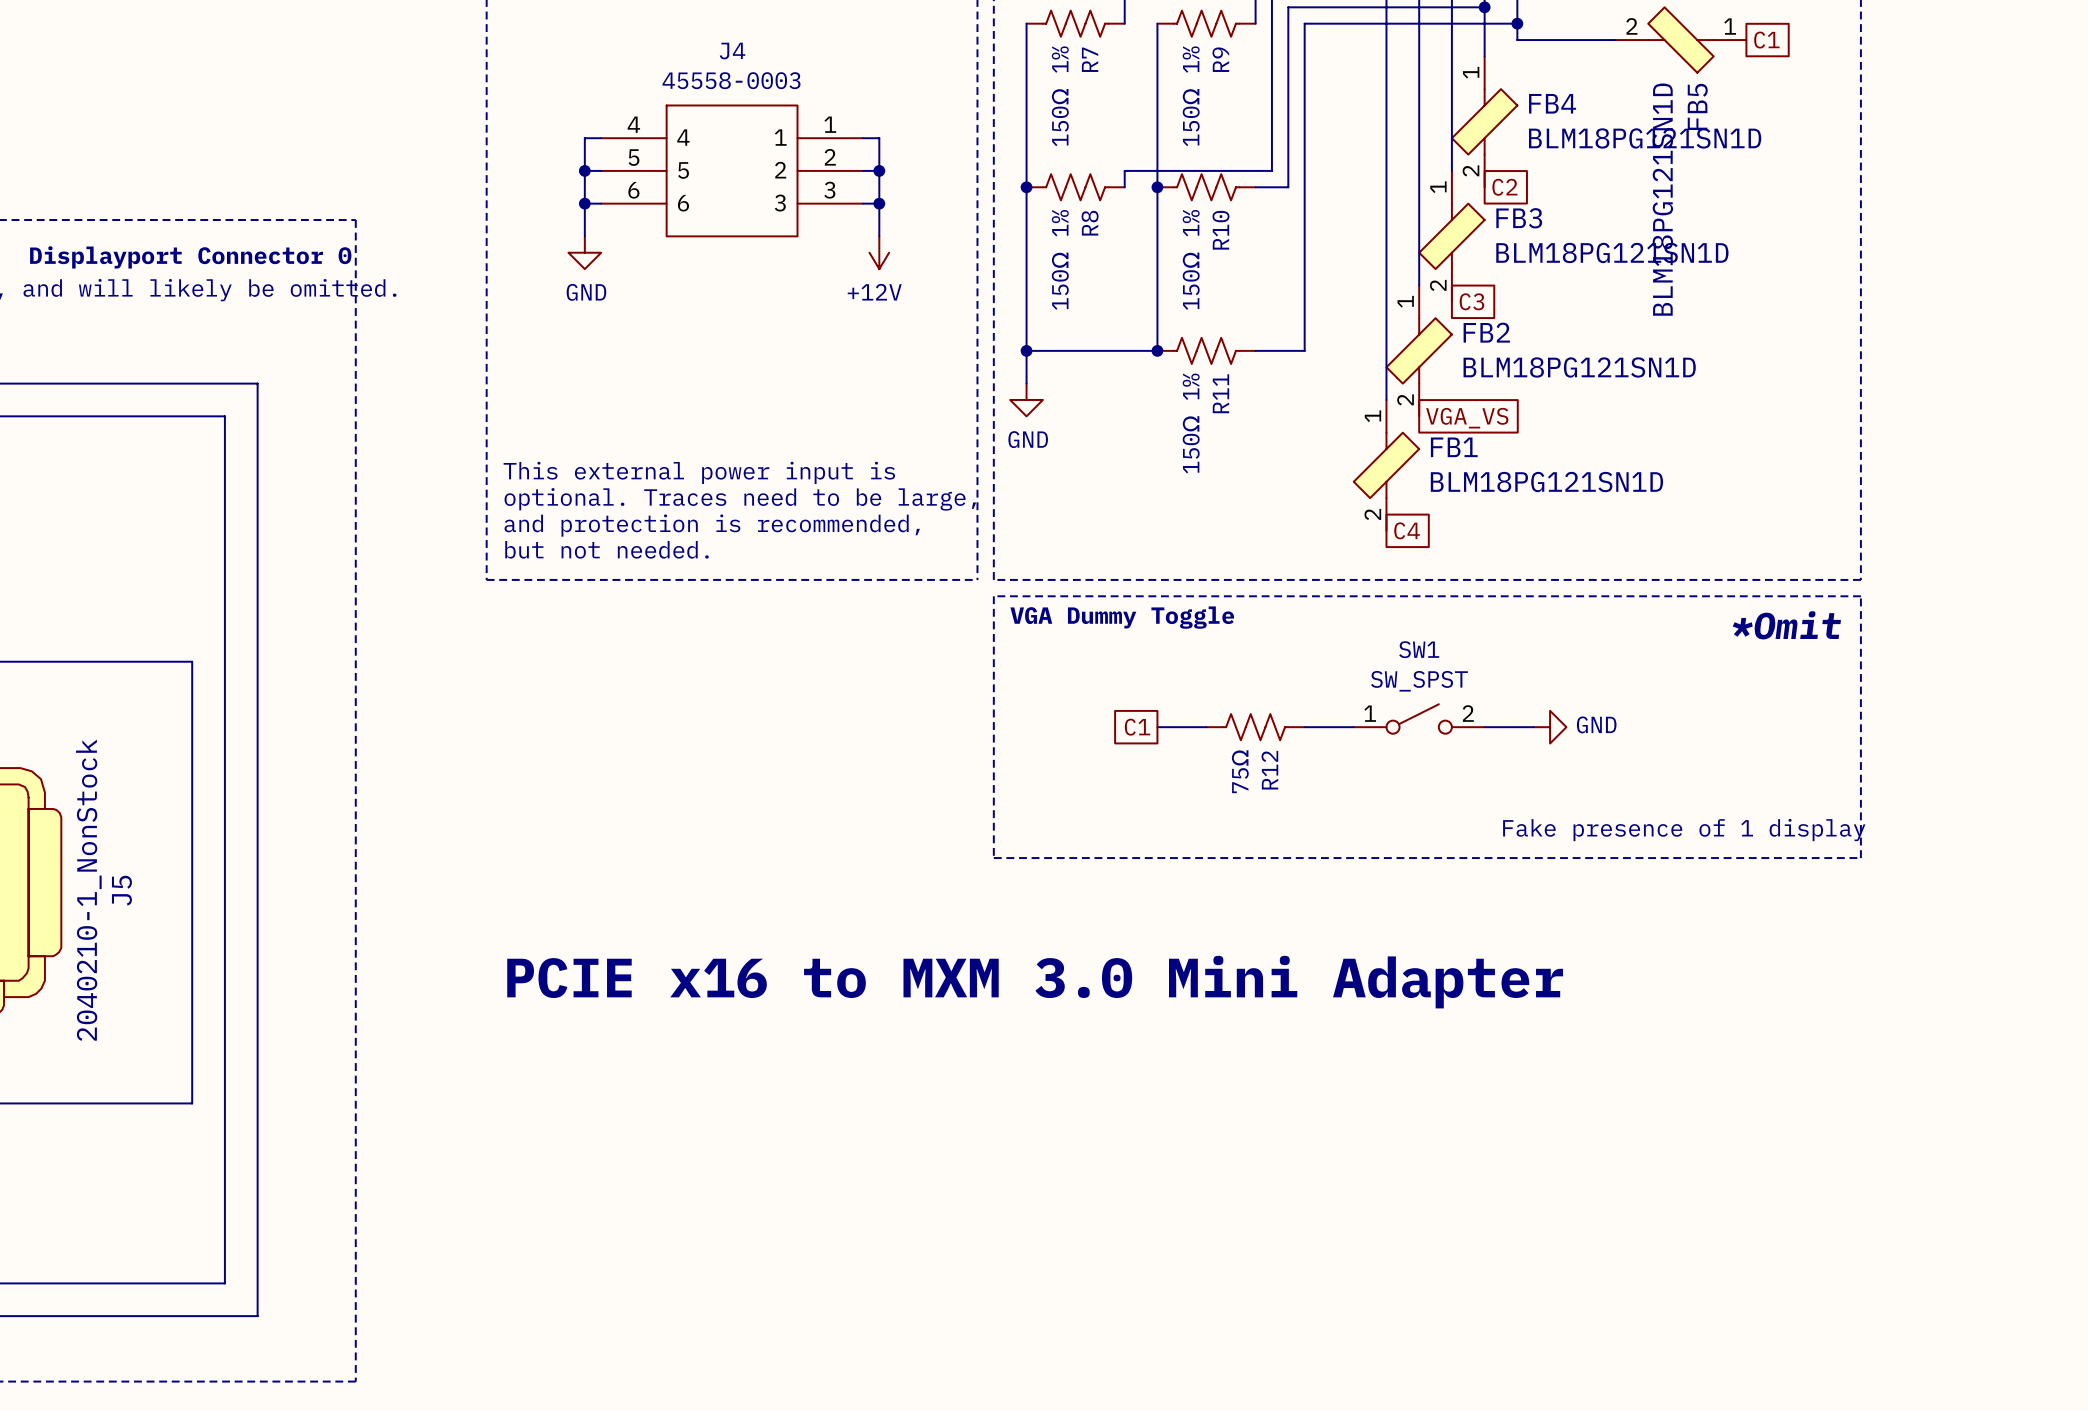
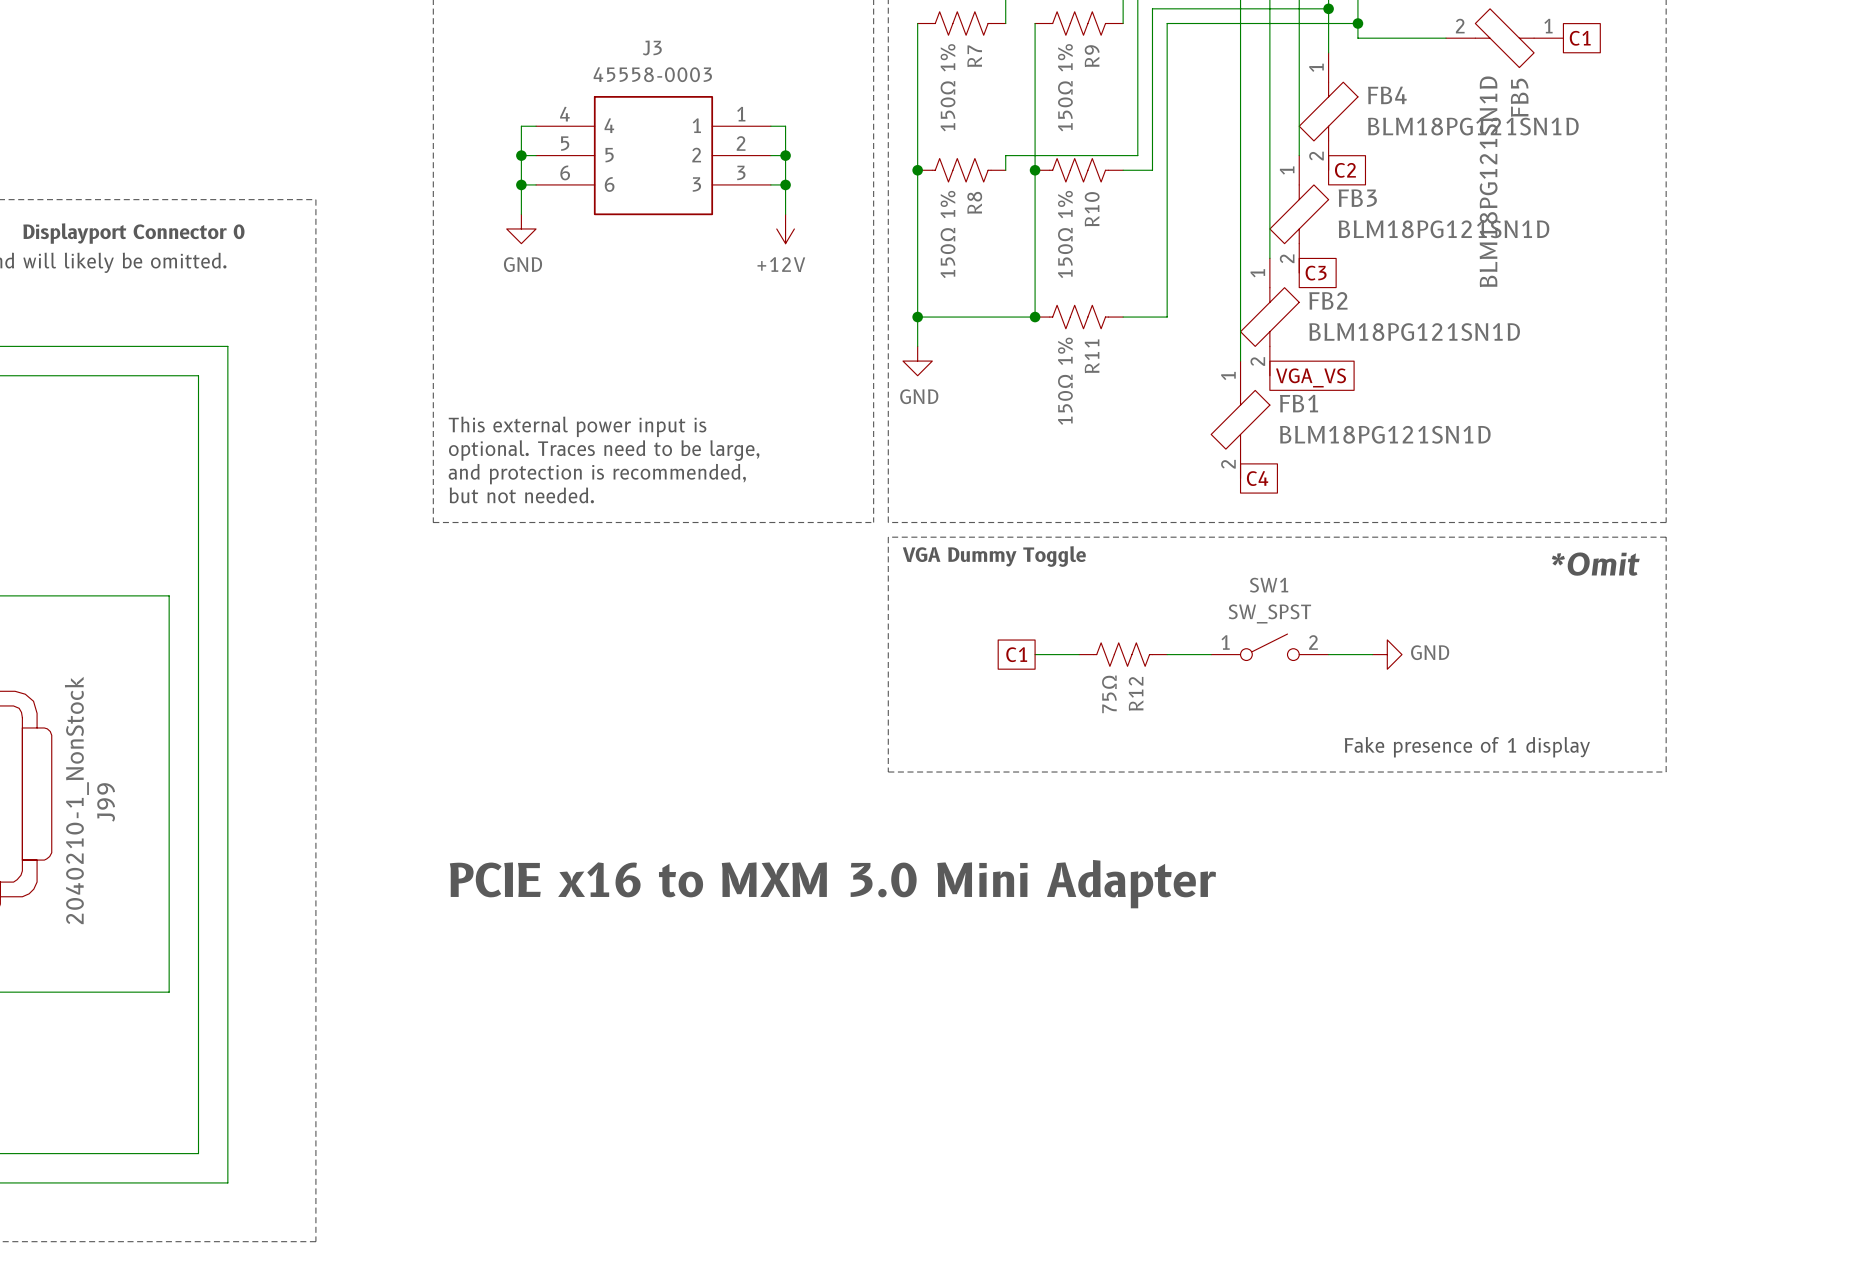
J4 name: J4 (732, 51) -> J3 (652, 47)
J5 name: J5 (121, 890) -> J99 (106, 802)

